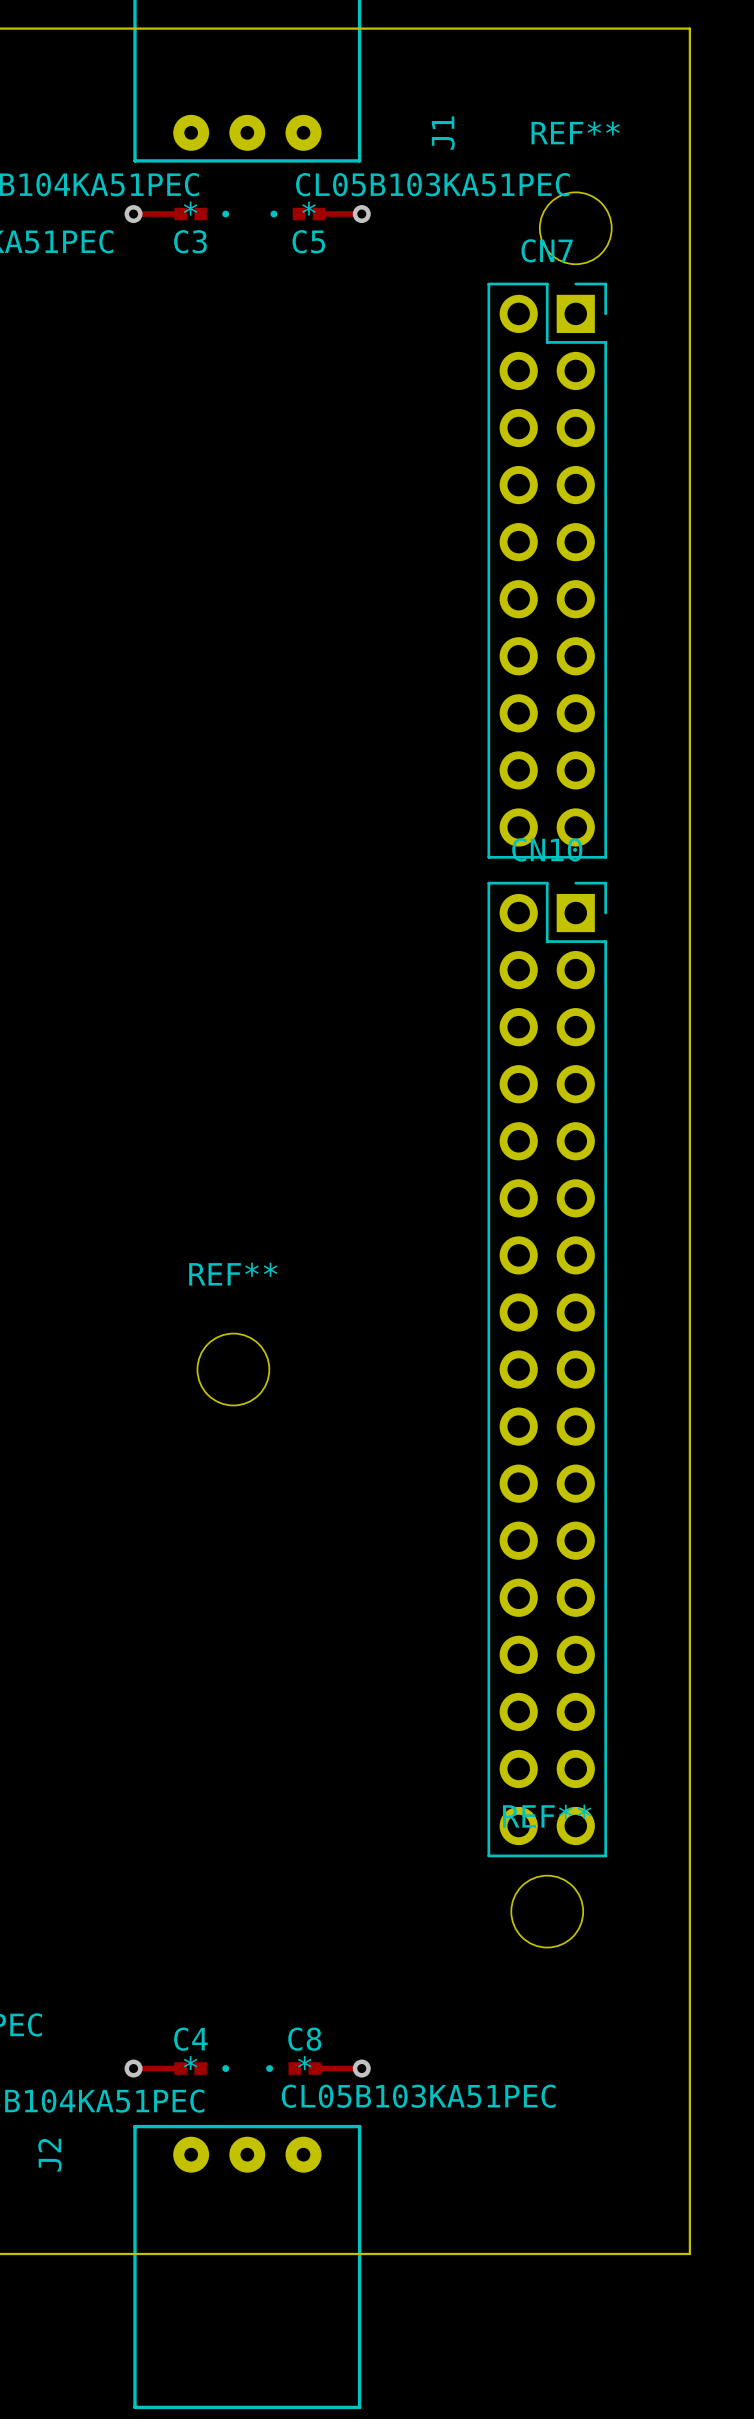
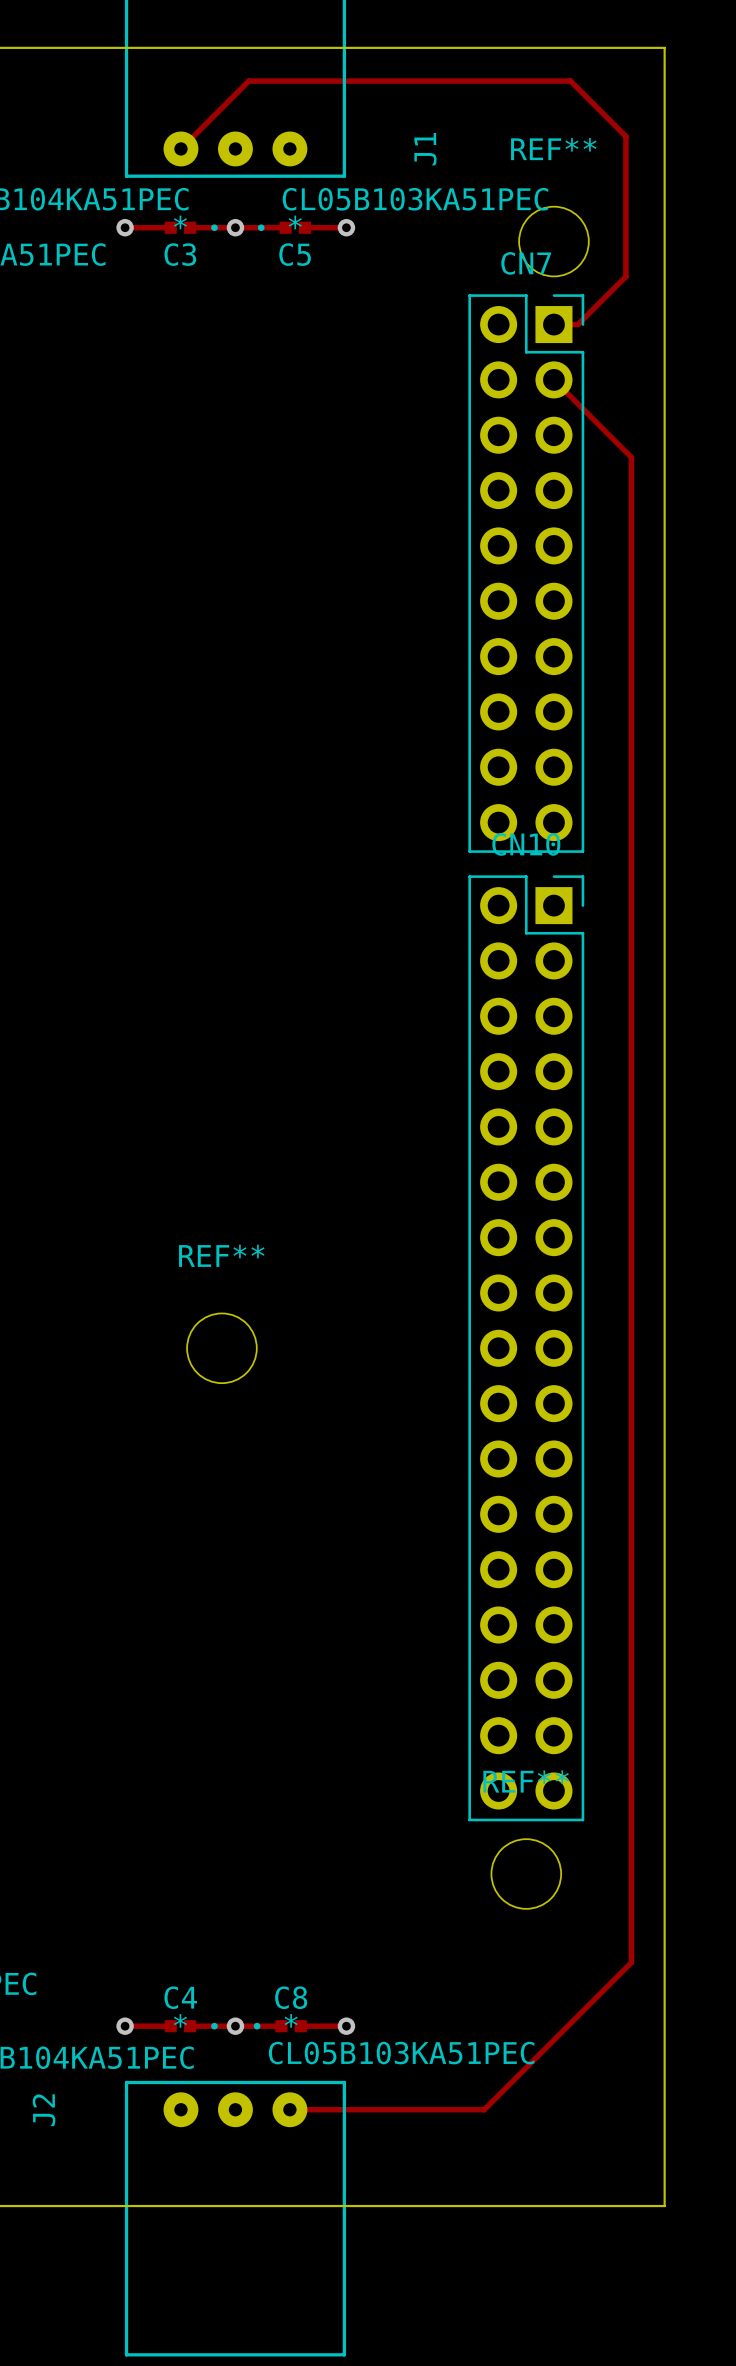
track: none -> (180, 148) (248, 81) (570, 81) (625, 136) (625, 276) (577, 324) (553, 324)
track: none -> (190, 227) (285, 227)
via: none -> (235, 227)
track: none -> (553, 379) (631, 457) (631, 1962) (484, 2109) (289, 2109)
track: none -> (190, 2026) (281, 2026)
via: none -> (235, 2026)

